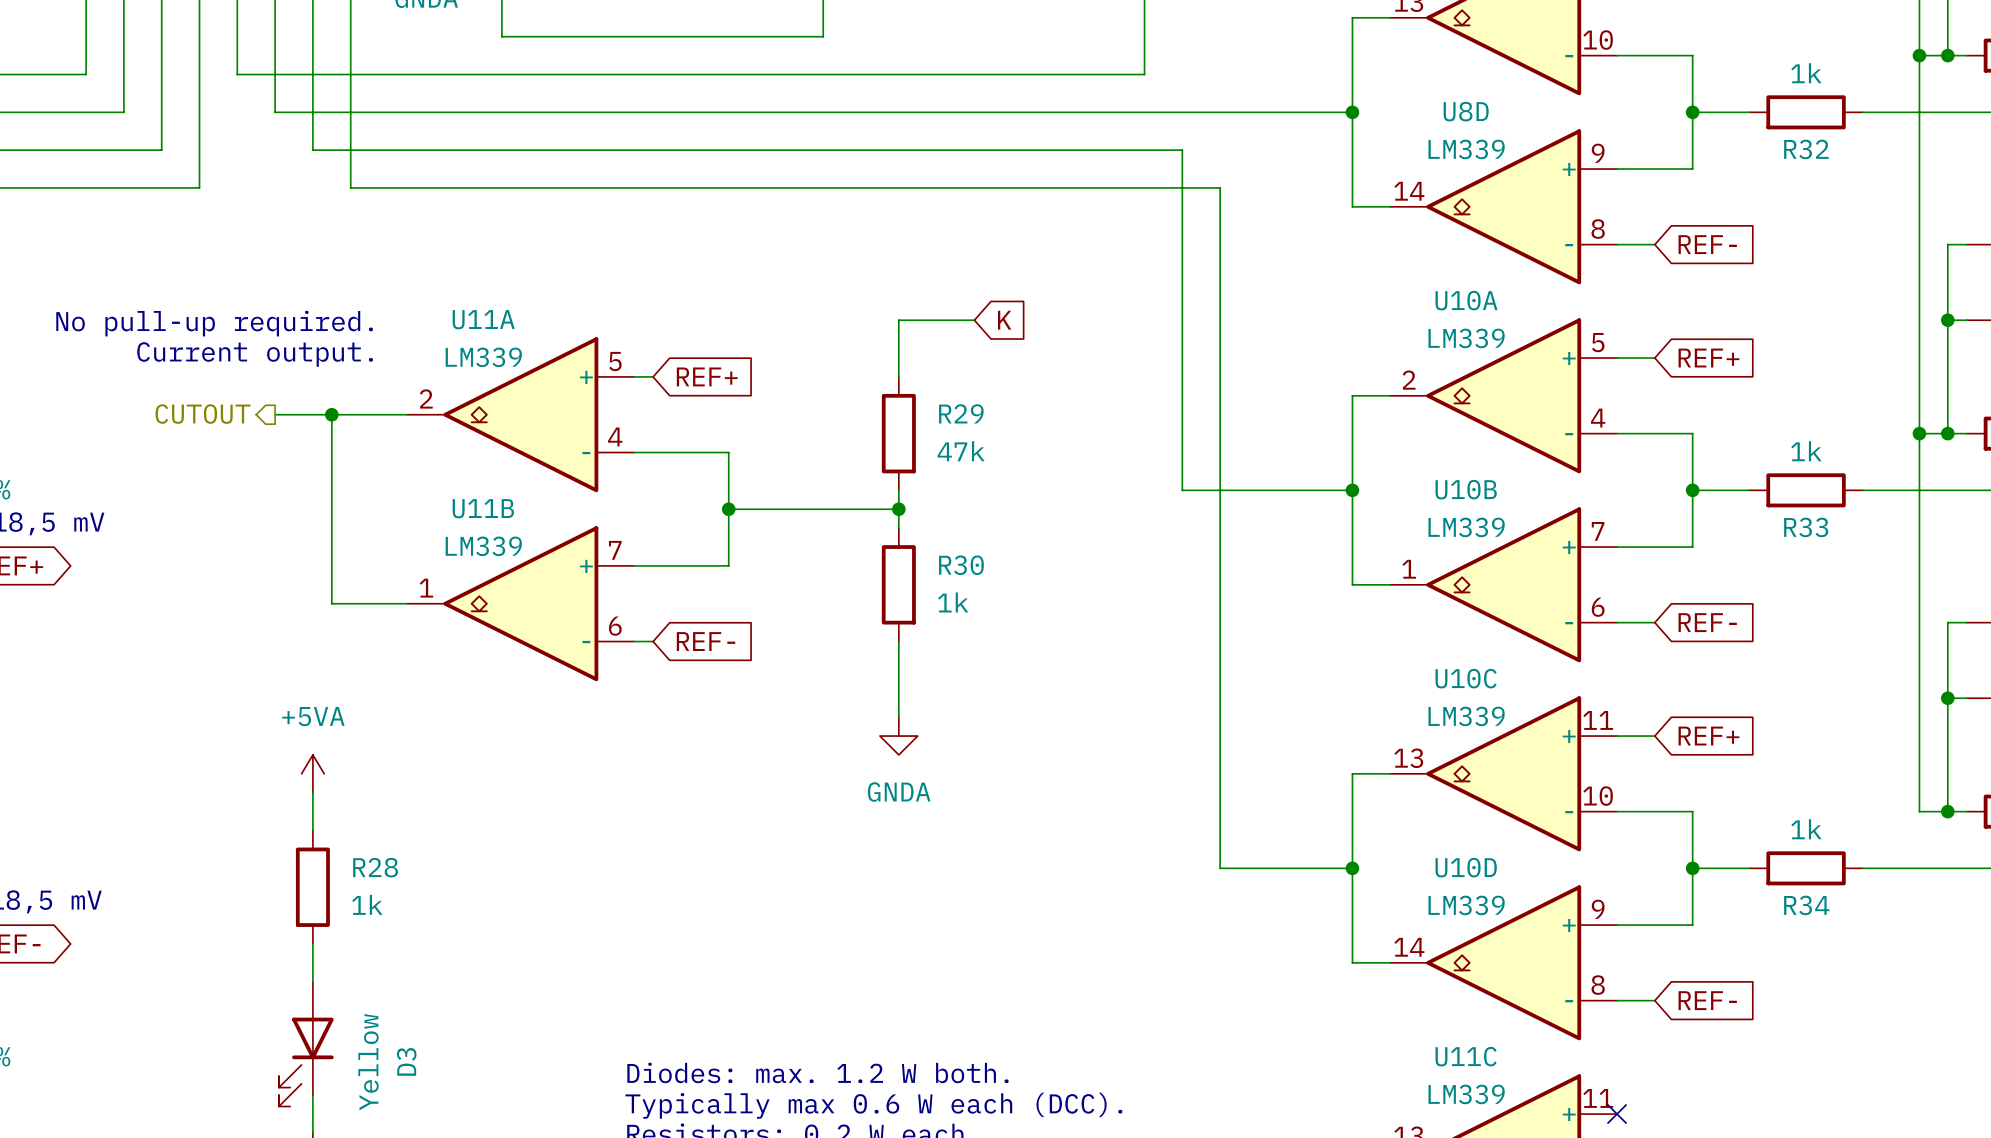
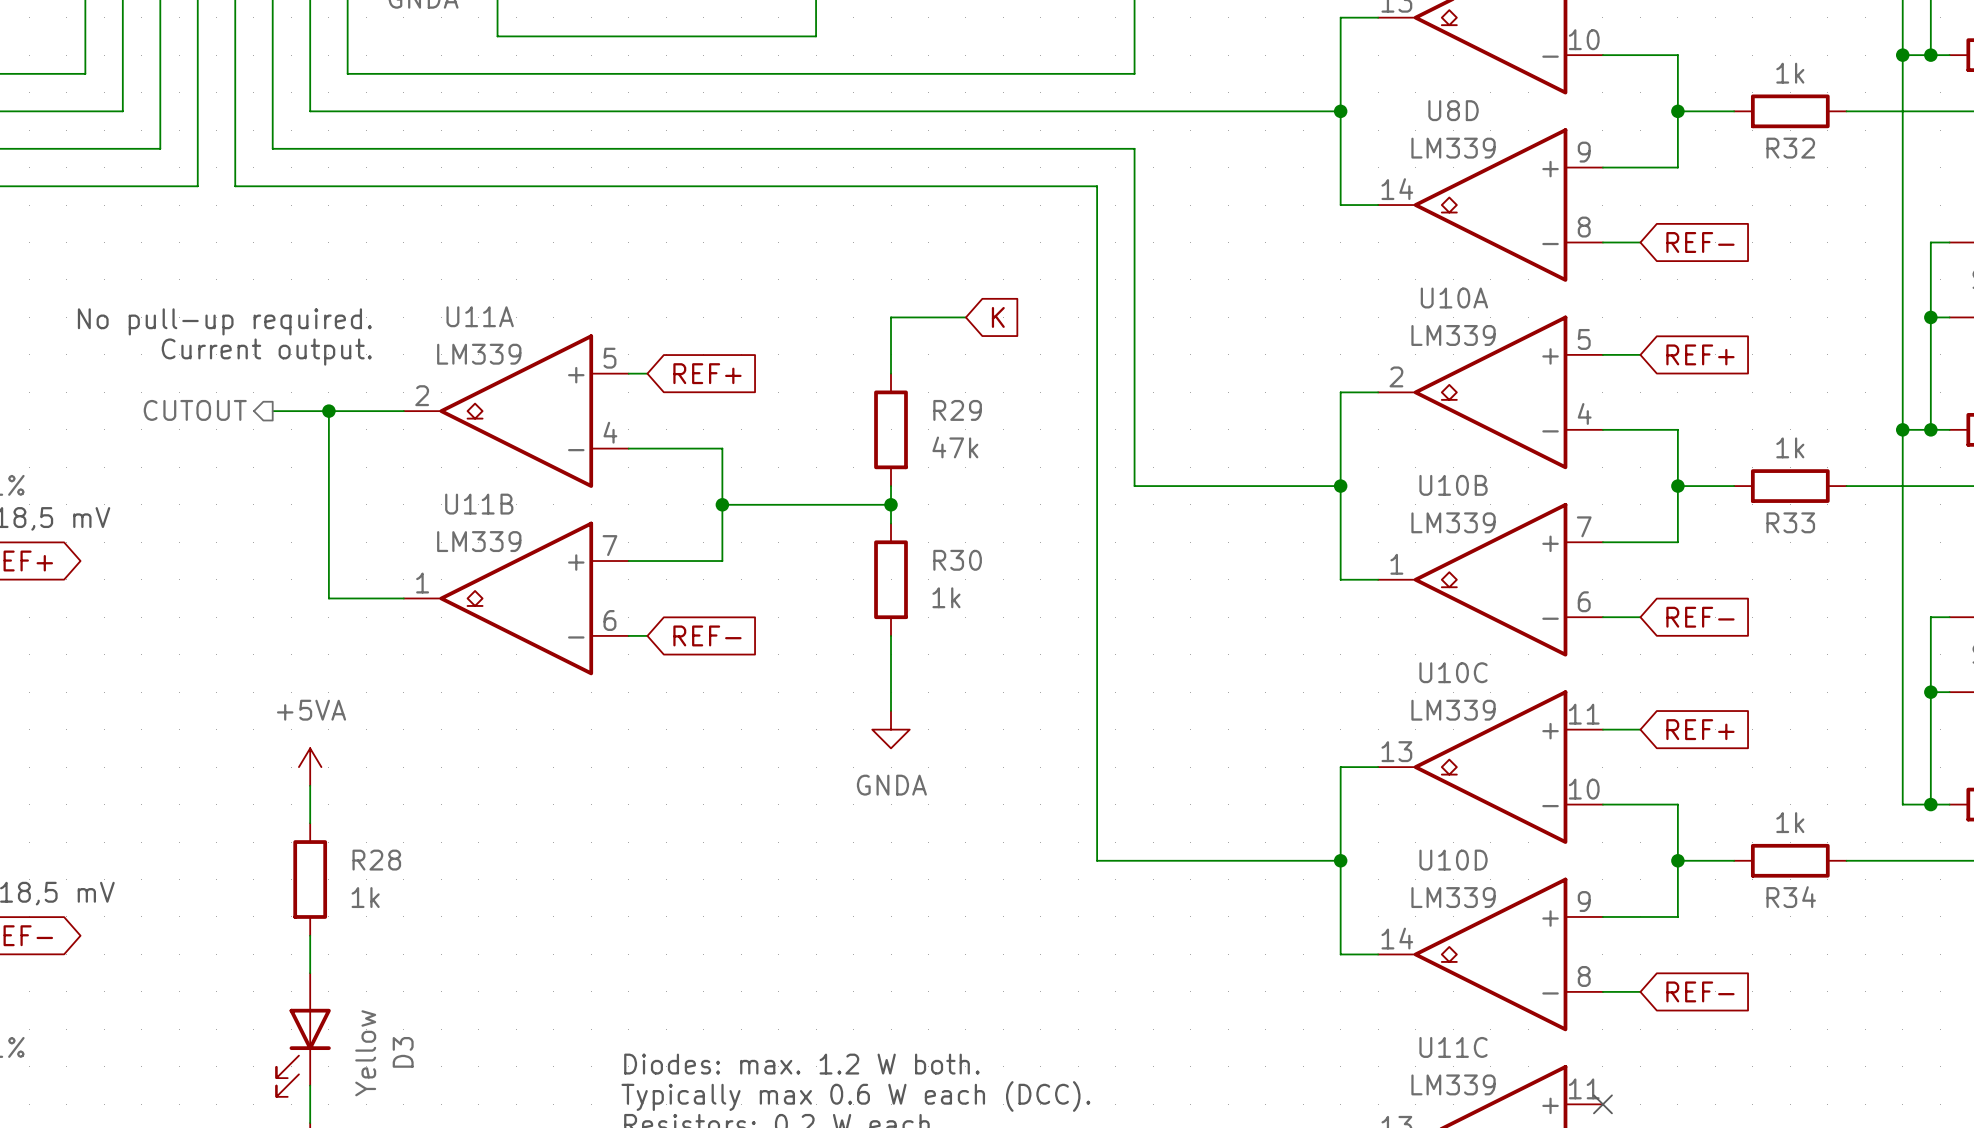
wire: (237, 74) (350, 74) (350, 187) -> (235, 73) (235, 186) (347, 186)
wire: (275, 112) (312, 112) (312, 150) -> (272, 111) (272, 148) (310, 148)
wire: (1144, 150) (1182, 150) (1182, 490) -> (1134, 148) (1134, 486) (1172, 486)
wire: (1106, 187) (1220, 187) (1220, 868) -> (1097, 186) (1097, 860) (1209, 860)

